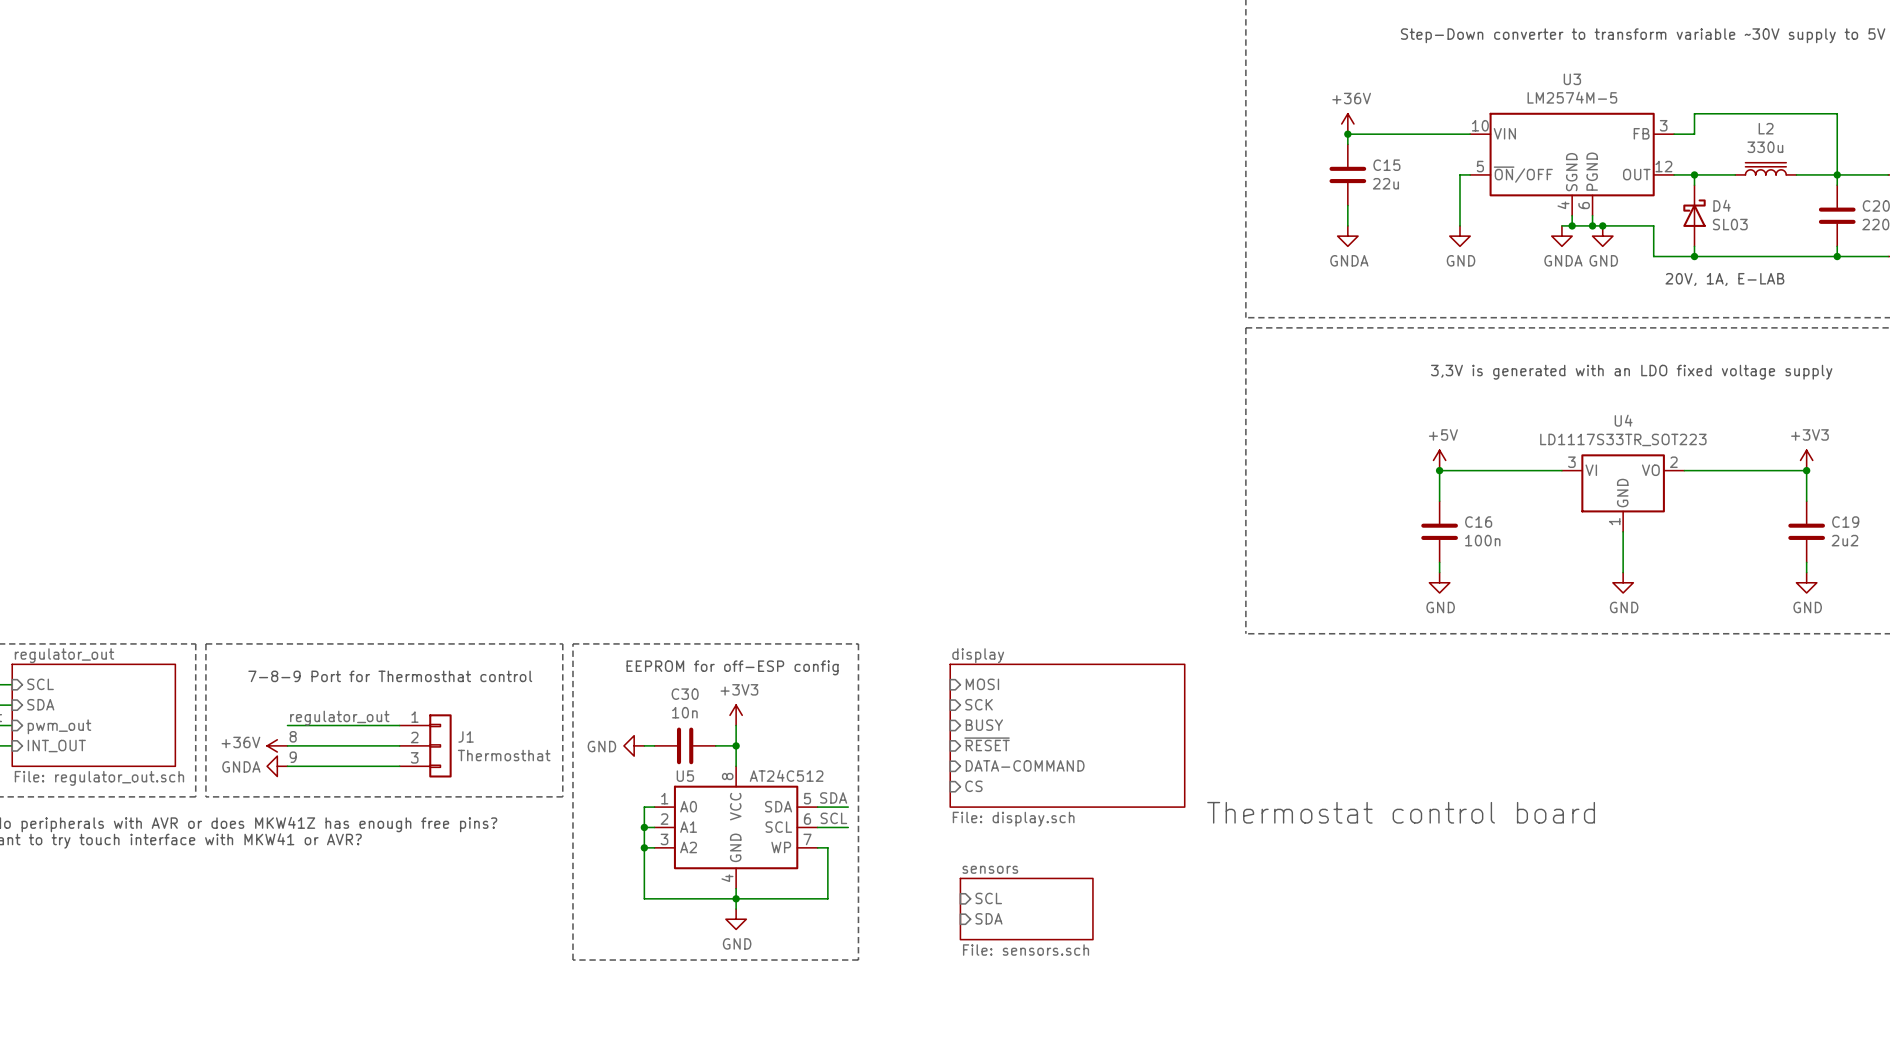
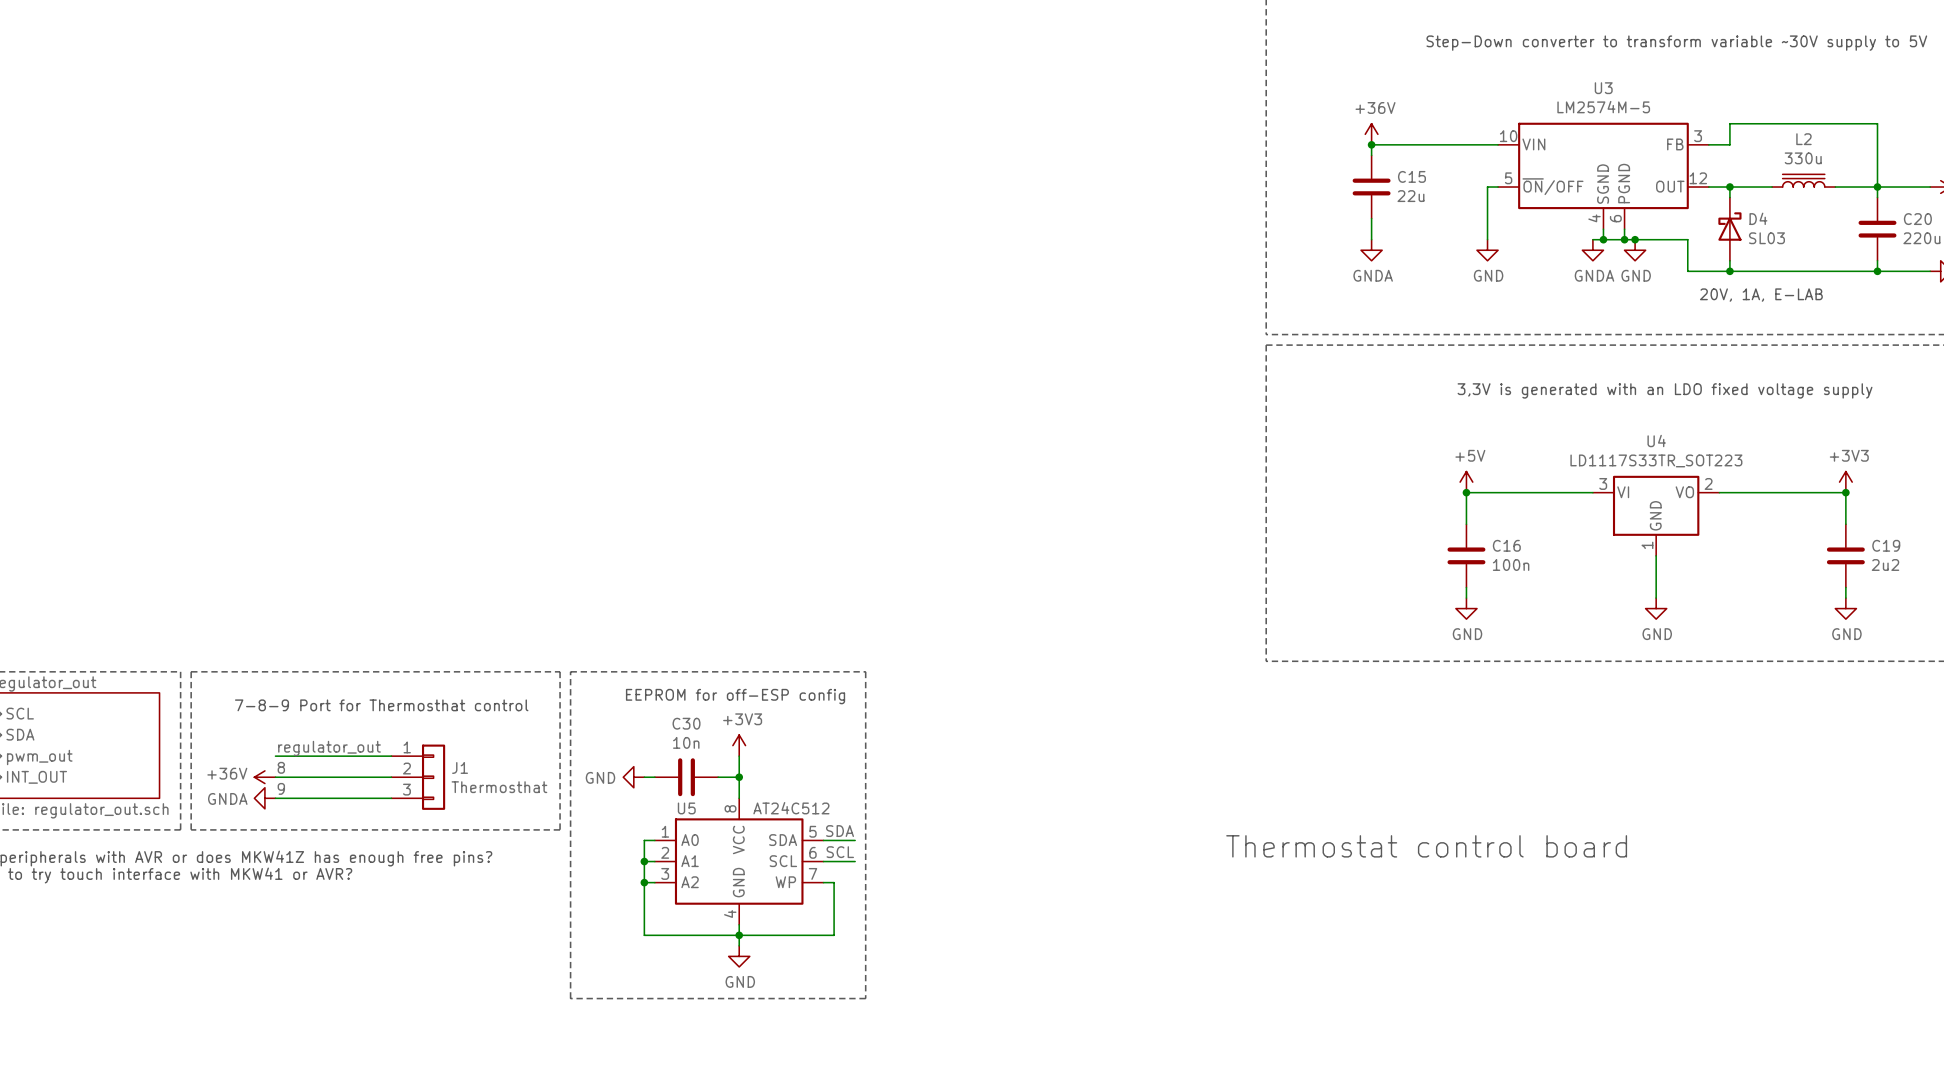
sheet pin: MOSI (982, 684) -> none
sheet pin: SCK (979, 704) -> none
sheet pin: BUSY (984, 725) -> none
sheet display: File: display.sch (1067, 735) -> none
sheet pin: ~{RESET} (987, 744) -> none
sheet pin: DATA-COMMAND (1025, 765) -> none
sheet pin: CS (973, 786) -> none
sheet pin: SCL (988, 898) -> none
sheet sensors: File: sensors.sch (1026, 909) -> none
sheet pin: SDA (988, 918) -> none

